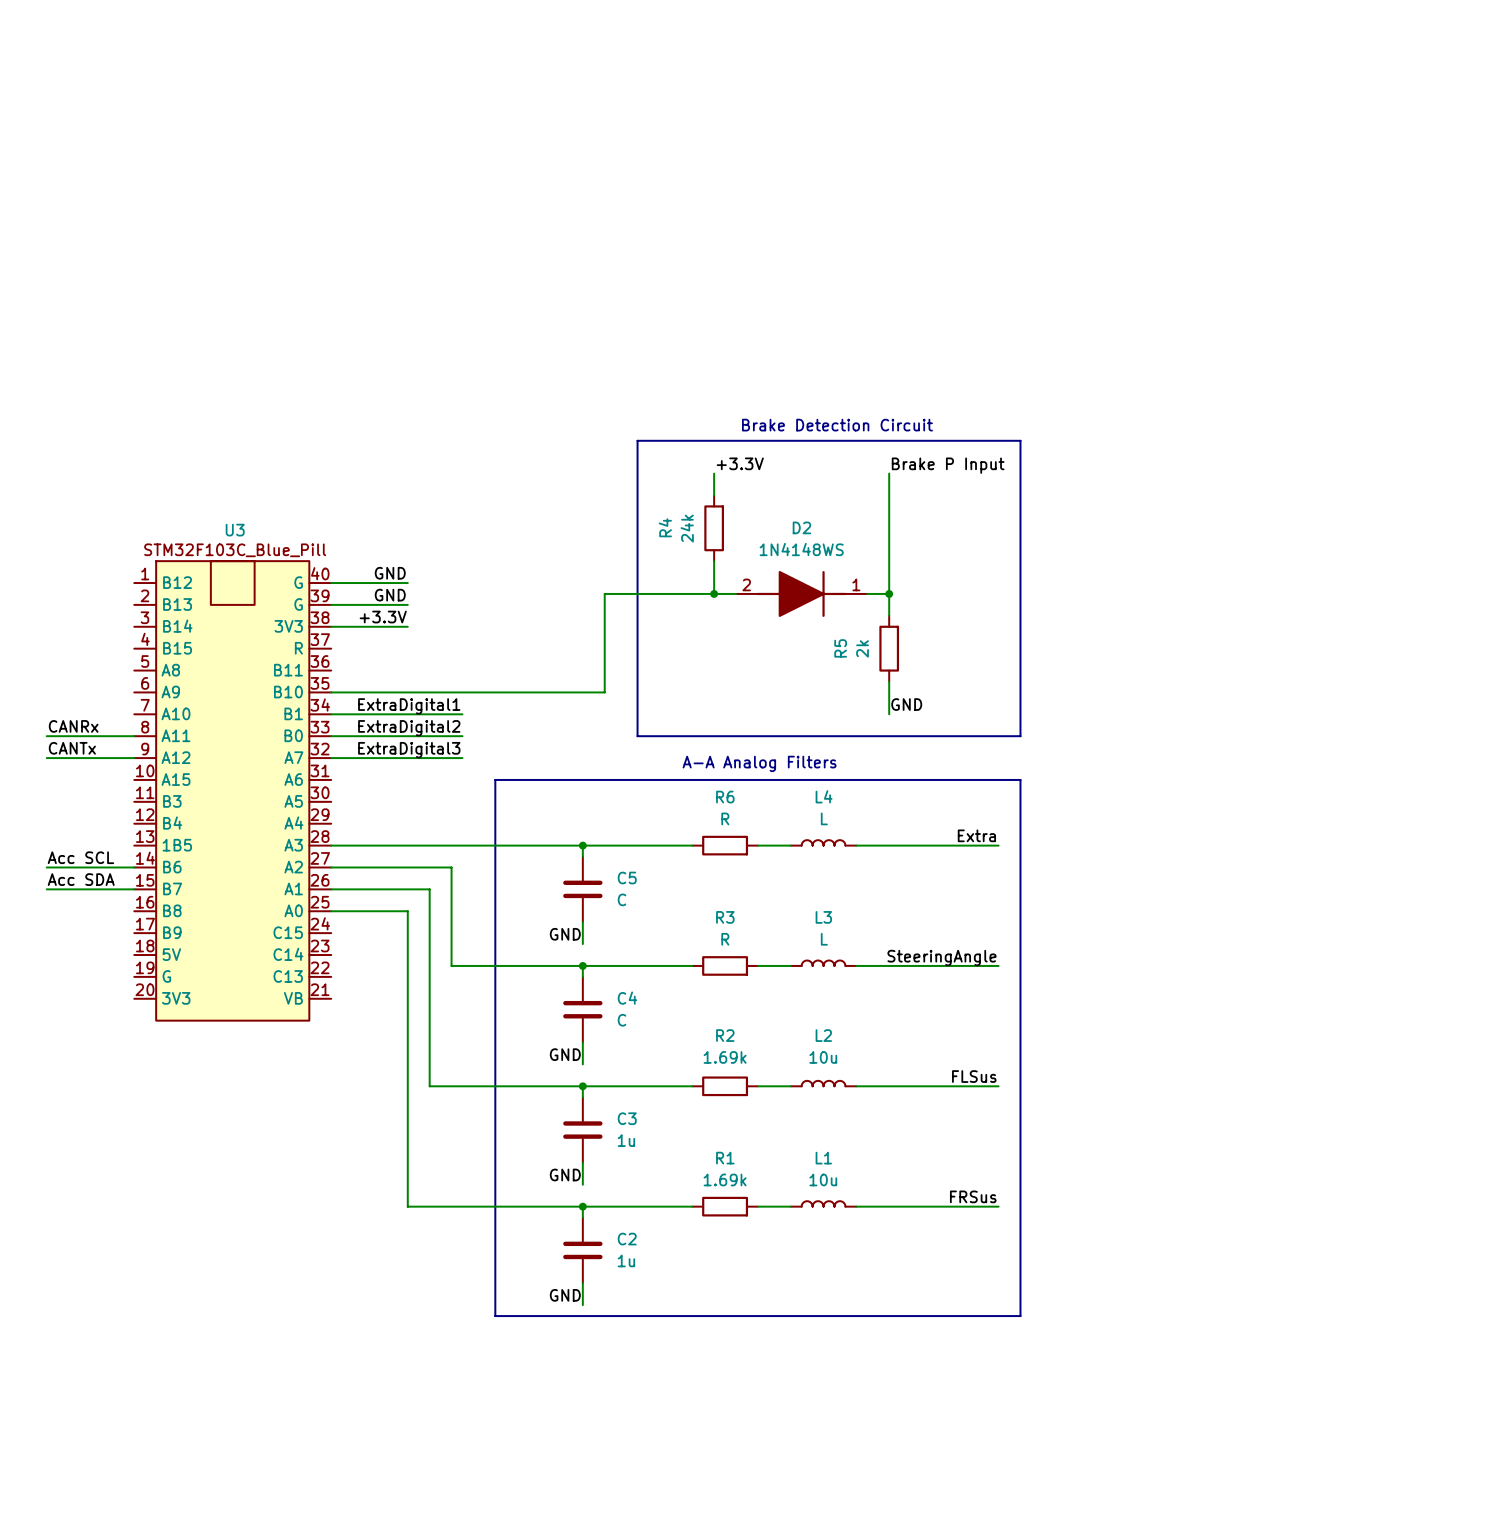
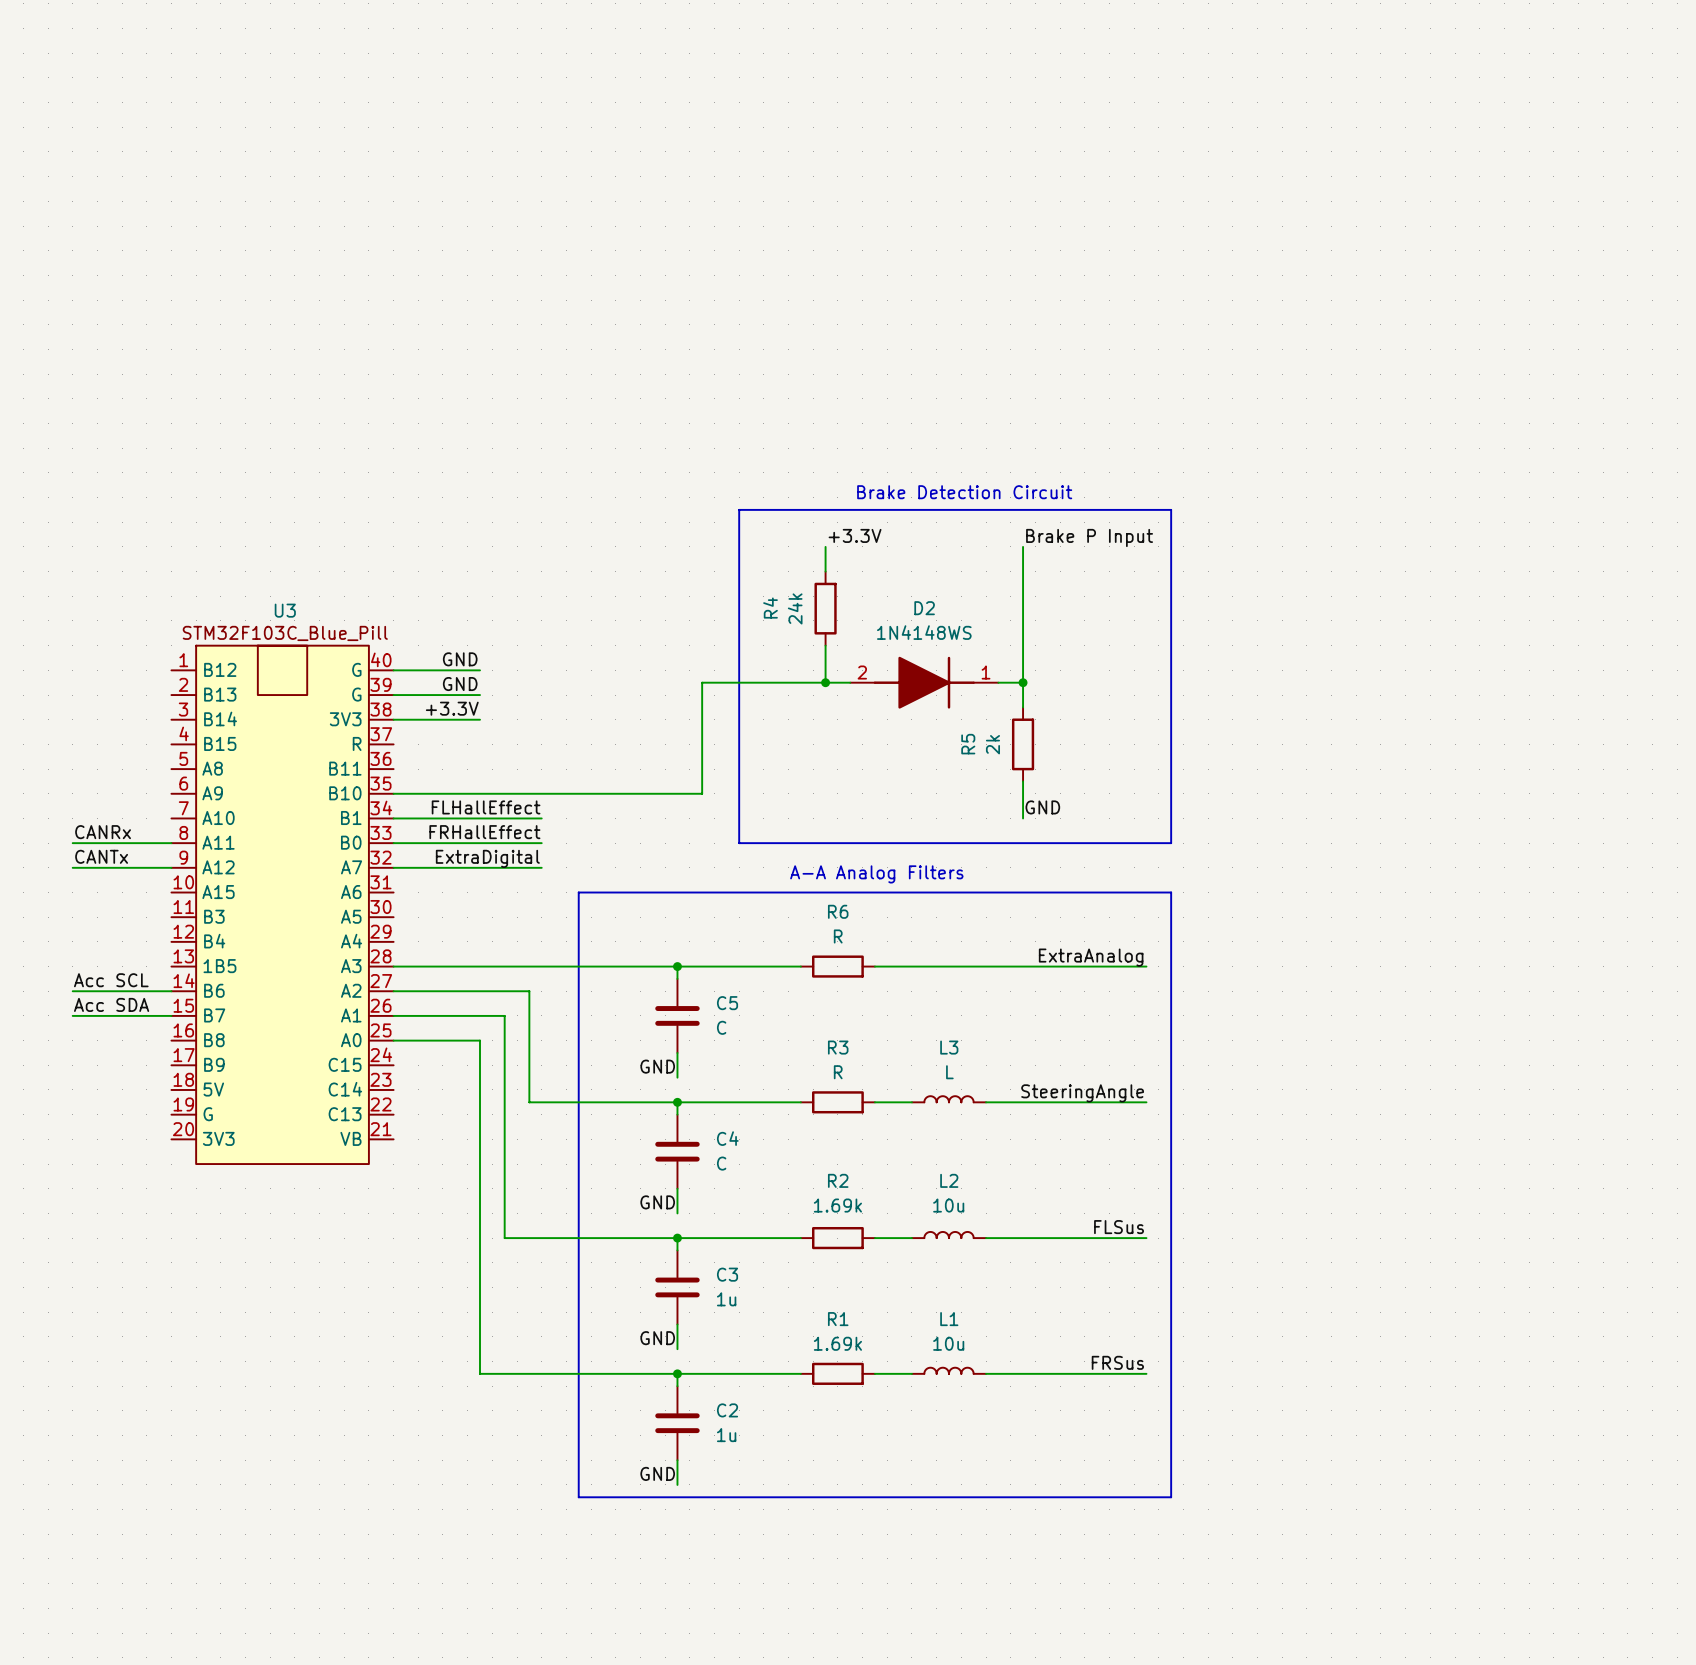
label: ExtraDigital1 (409, 706) -> FLHallEffect (486, 807)
label: ExtraDigital2 (409, 728) -> FRHallEffect (484, 832)
label: ExtraDigital3 (409, 750) -> ExtraDigital (487, 858)
label: Extra (976, 835) -> ExtraAnalog (1091, 957)
L4: L (823, 842) -> none
wire: none -> (911, 966) (986, 966)

